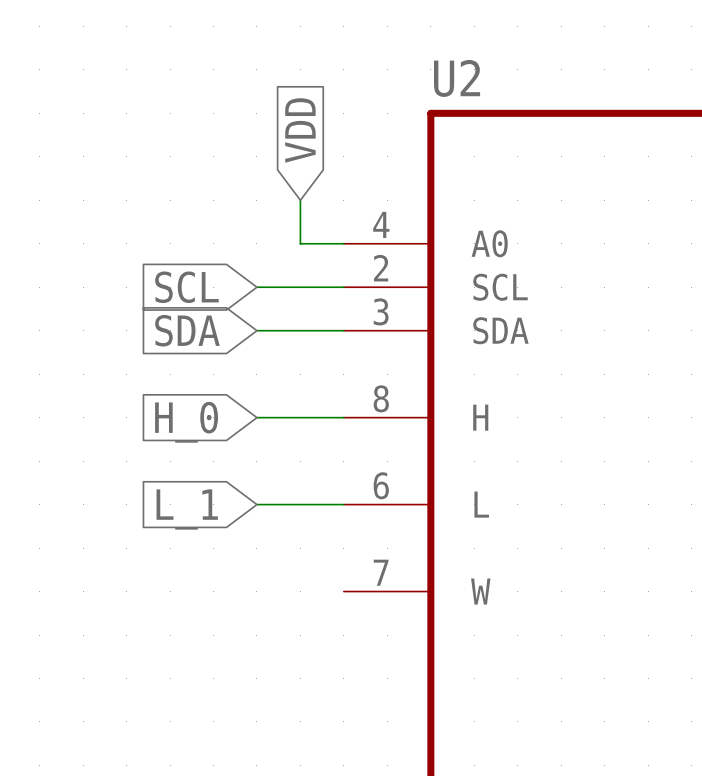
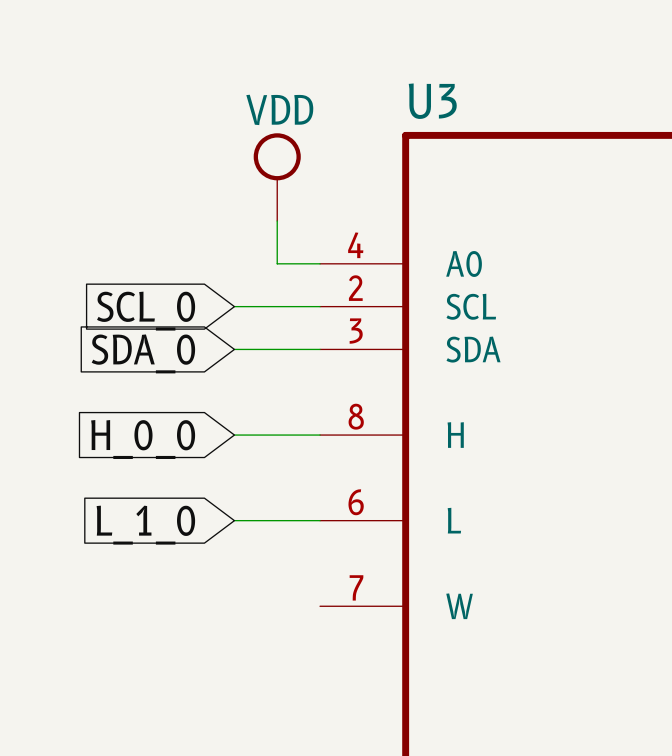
U2 name: U2 (457, 78) -> U3 (432, 101)
global label: VDD (300, 130) -> none
power symbol: none -> VDD (277, 177)
global label: SCL (186, 287) -> SCL_0 (146, 311)
global label: SDA (187, 330) -> SDA_0 (143, 353)
global label: H_0 (186, 422) -> H_0_0 (143, 439)
global label: L_1 (187, 509) -> L_1_0 (145, 525)

